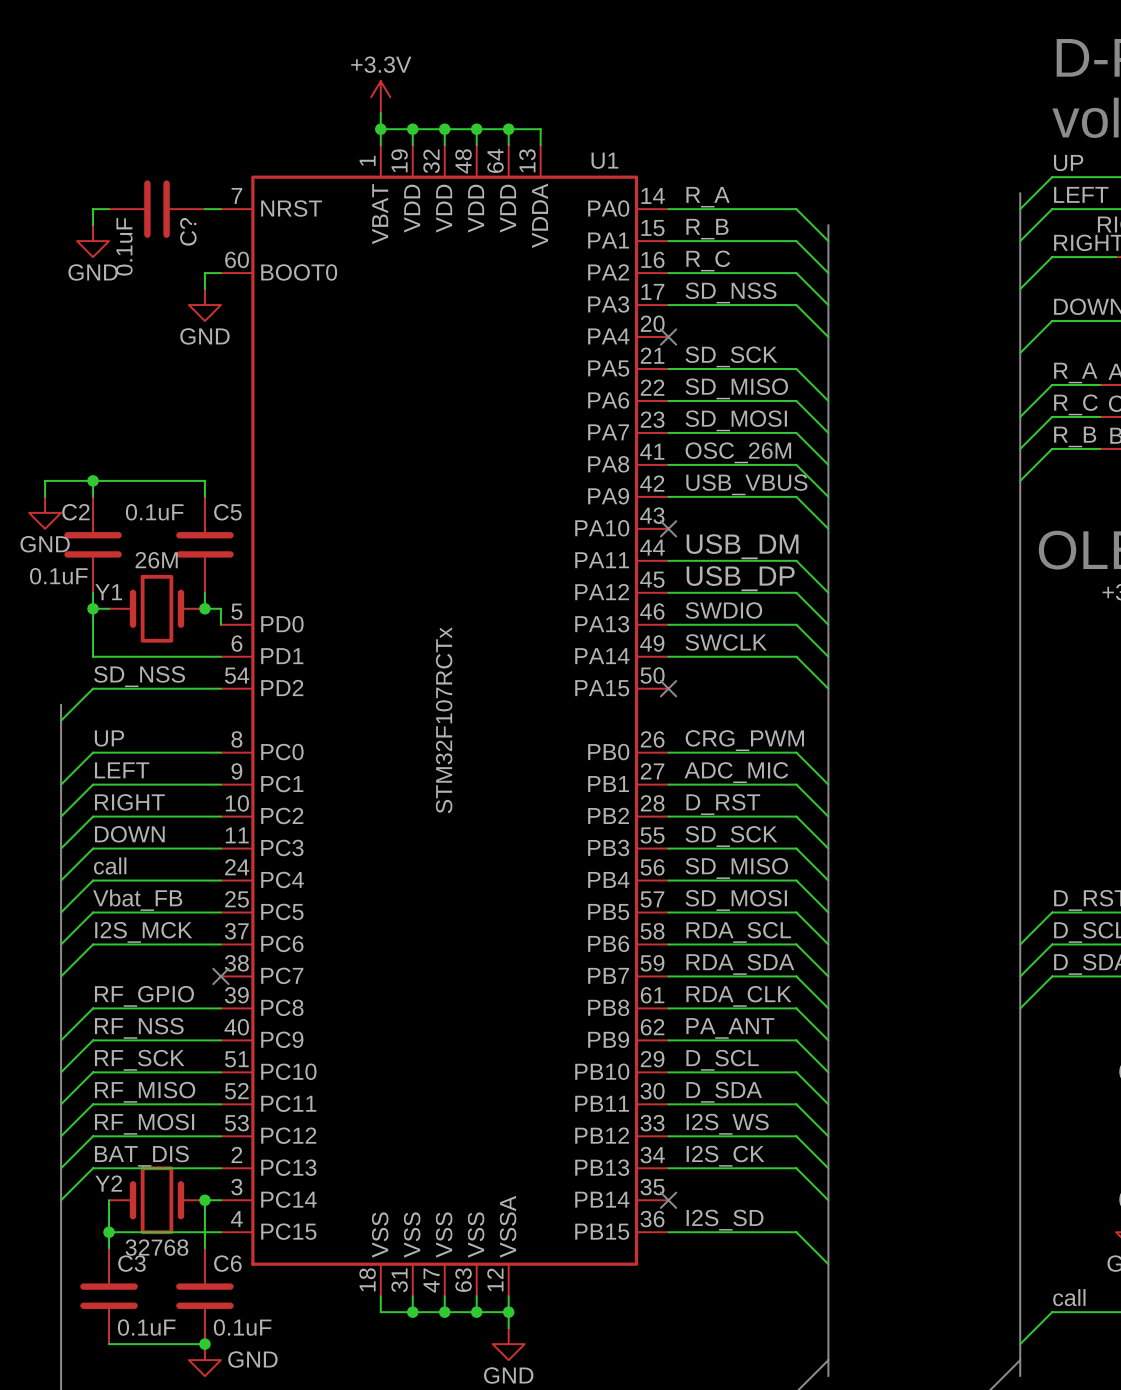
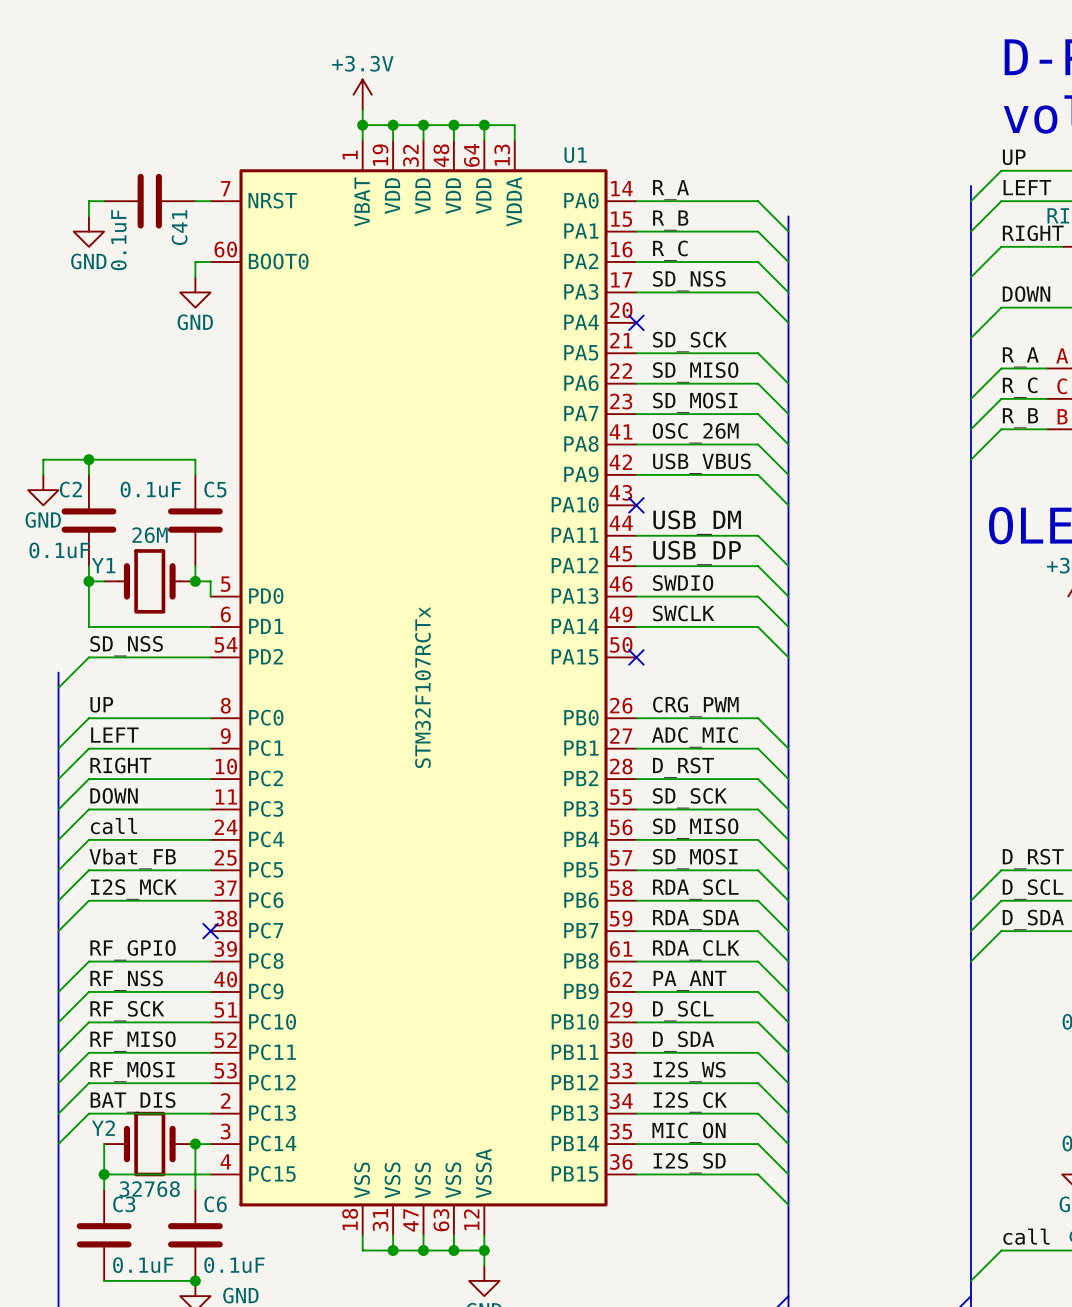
C? name: C? (188, 231) -> C41 (179, 227)
label: none -> MIC_ON (689, 1132)
wire: none -> (636, 1144) (758, 1144) (788, 1174)
no-connect mark: (668, 1200) -> none

